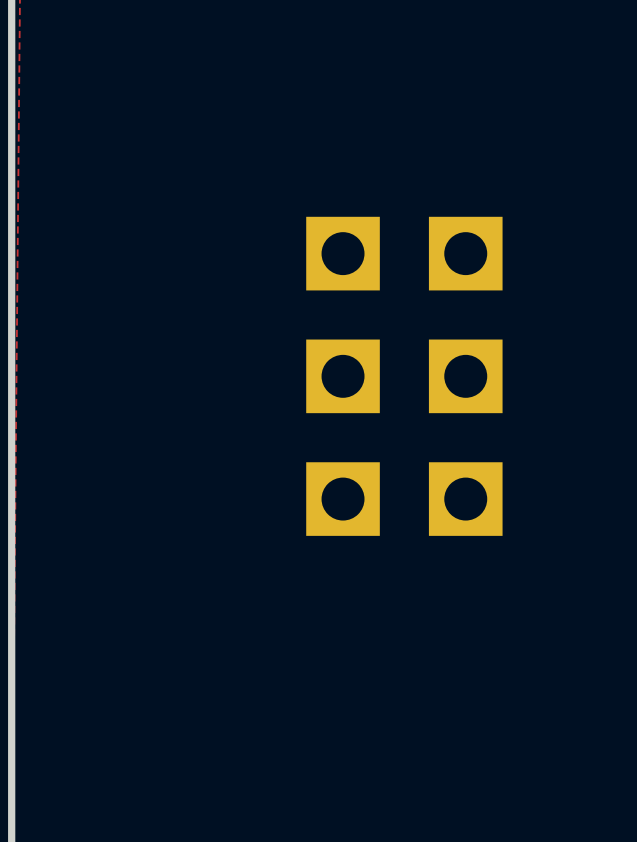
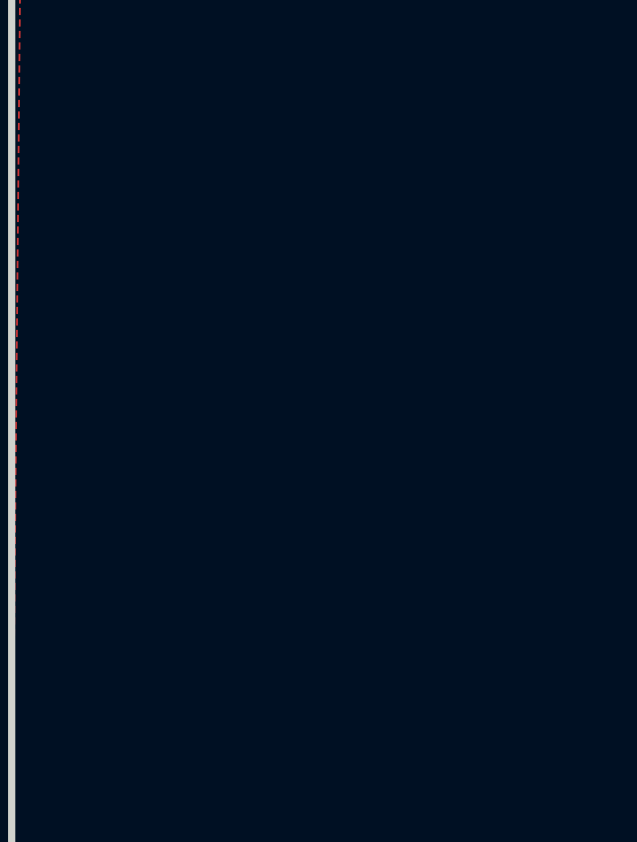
part: (404, 376) -> none

